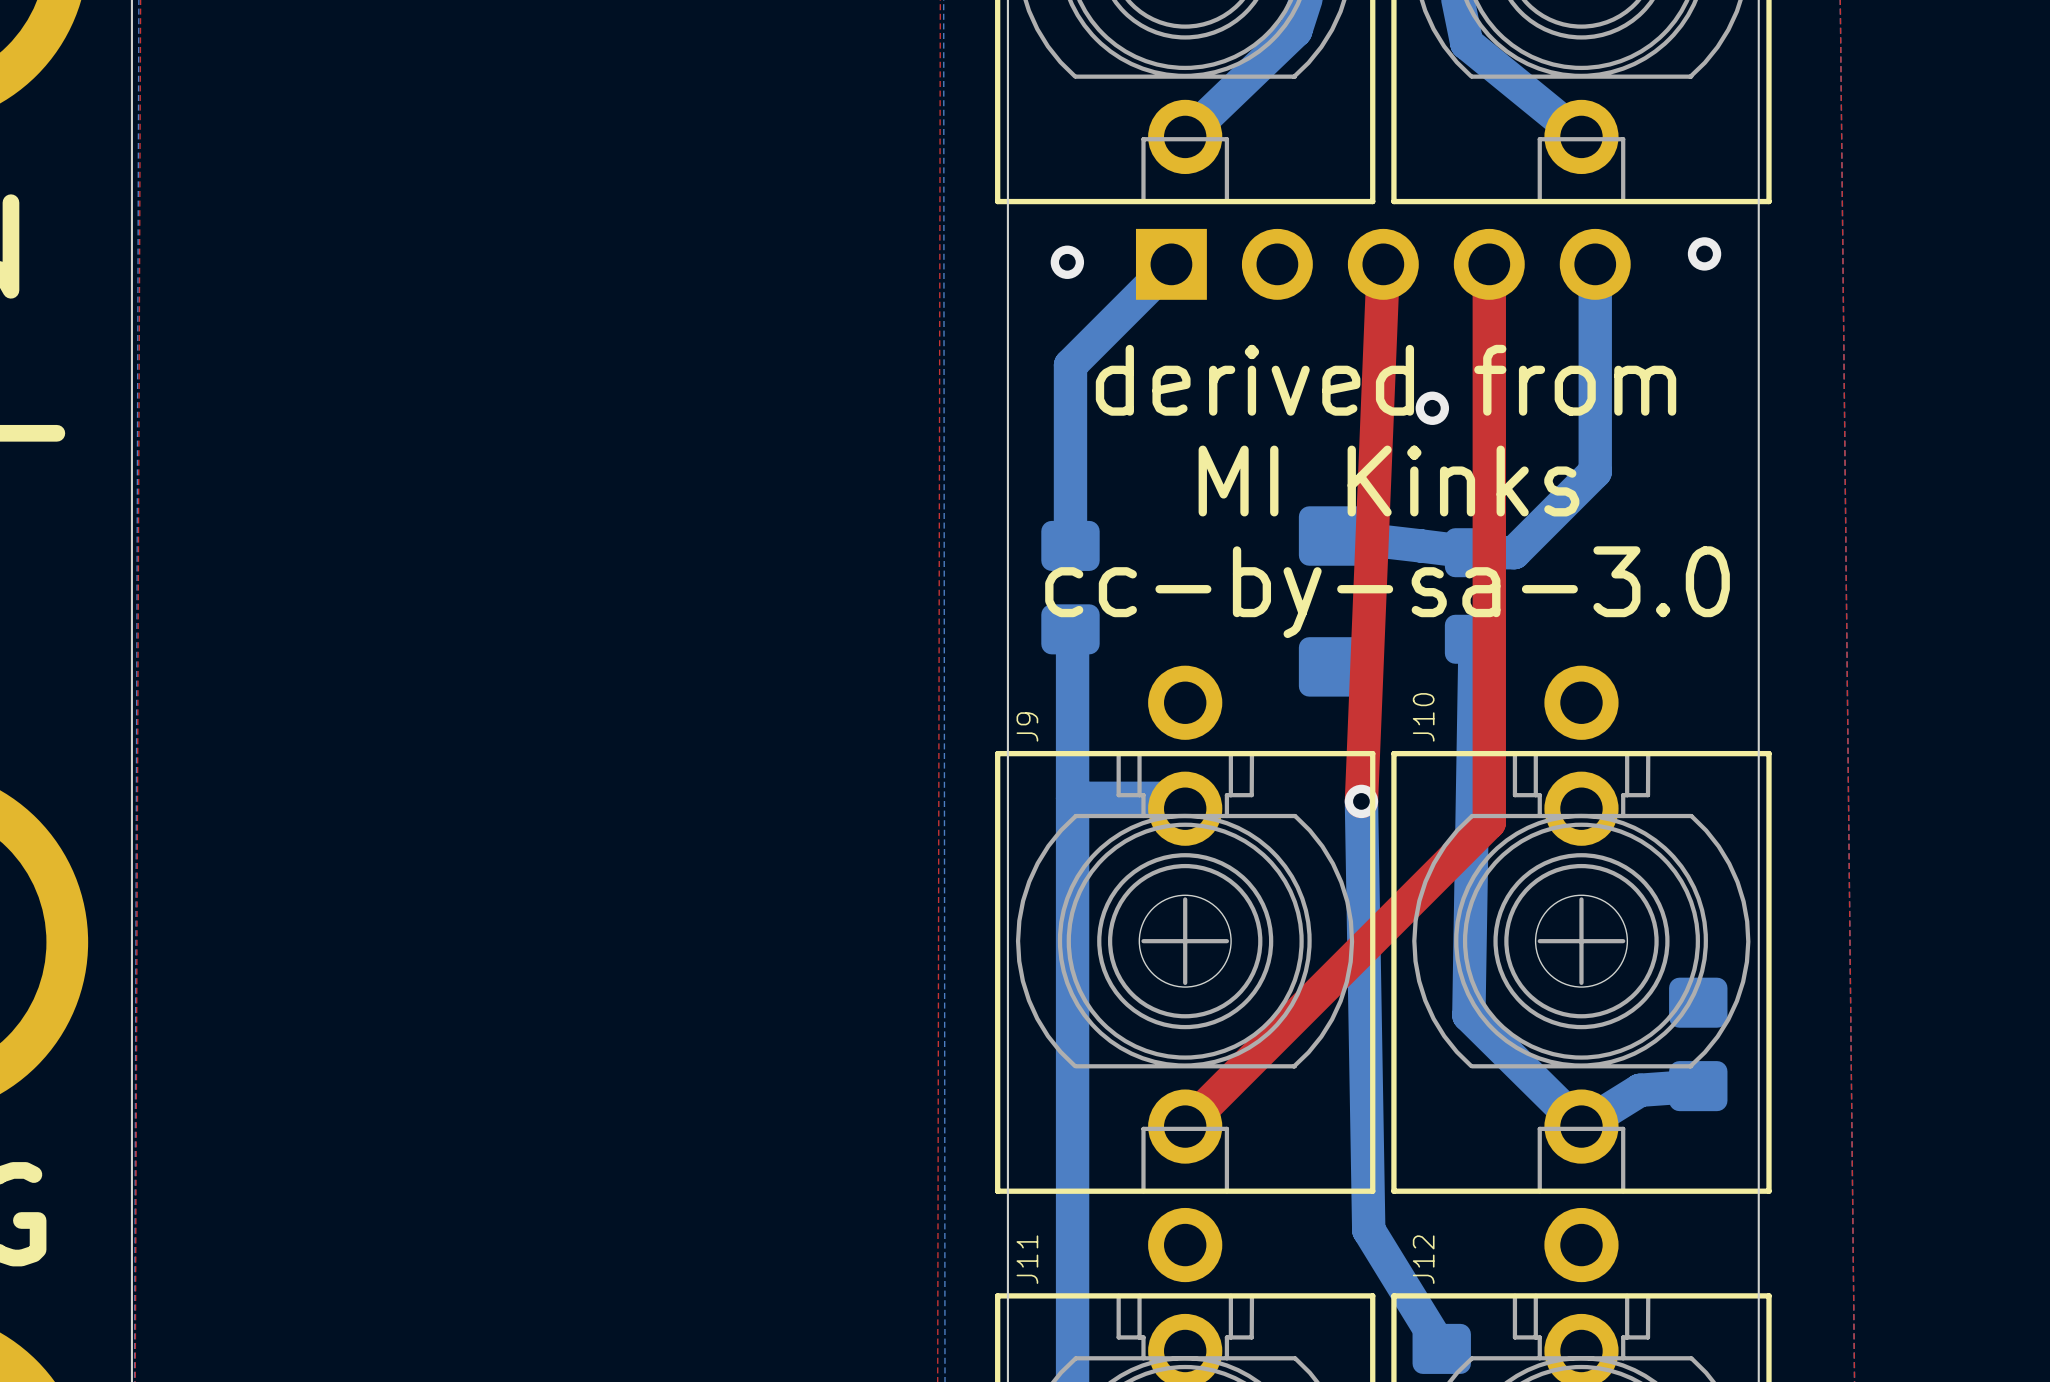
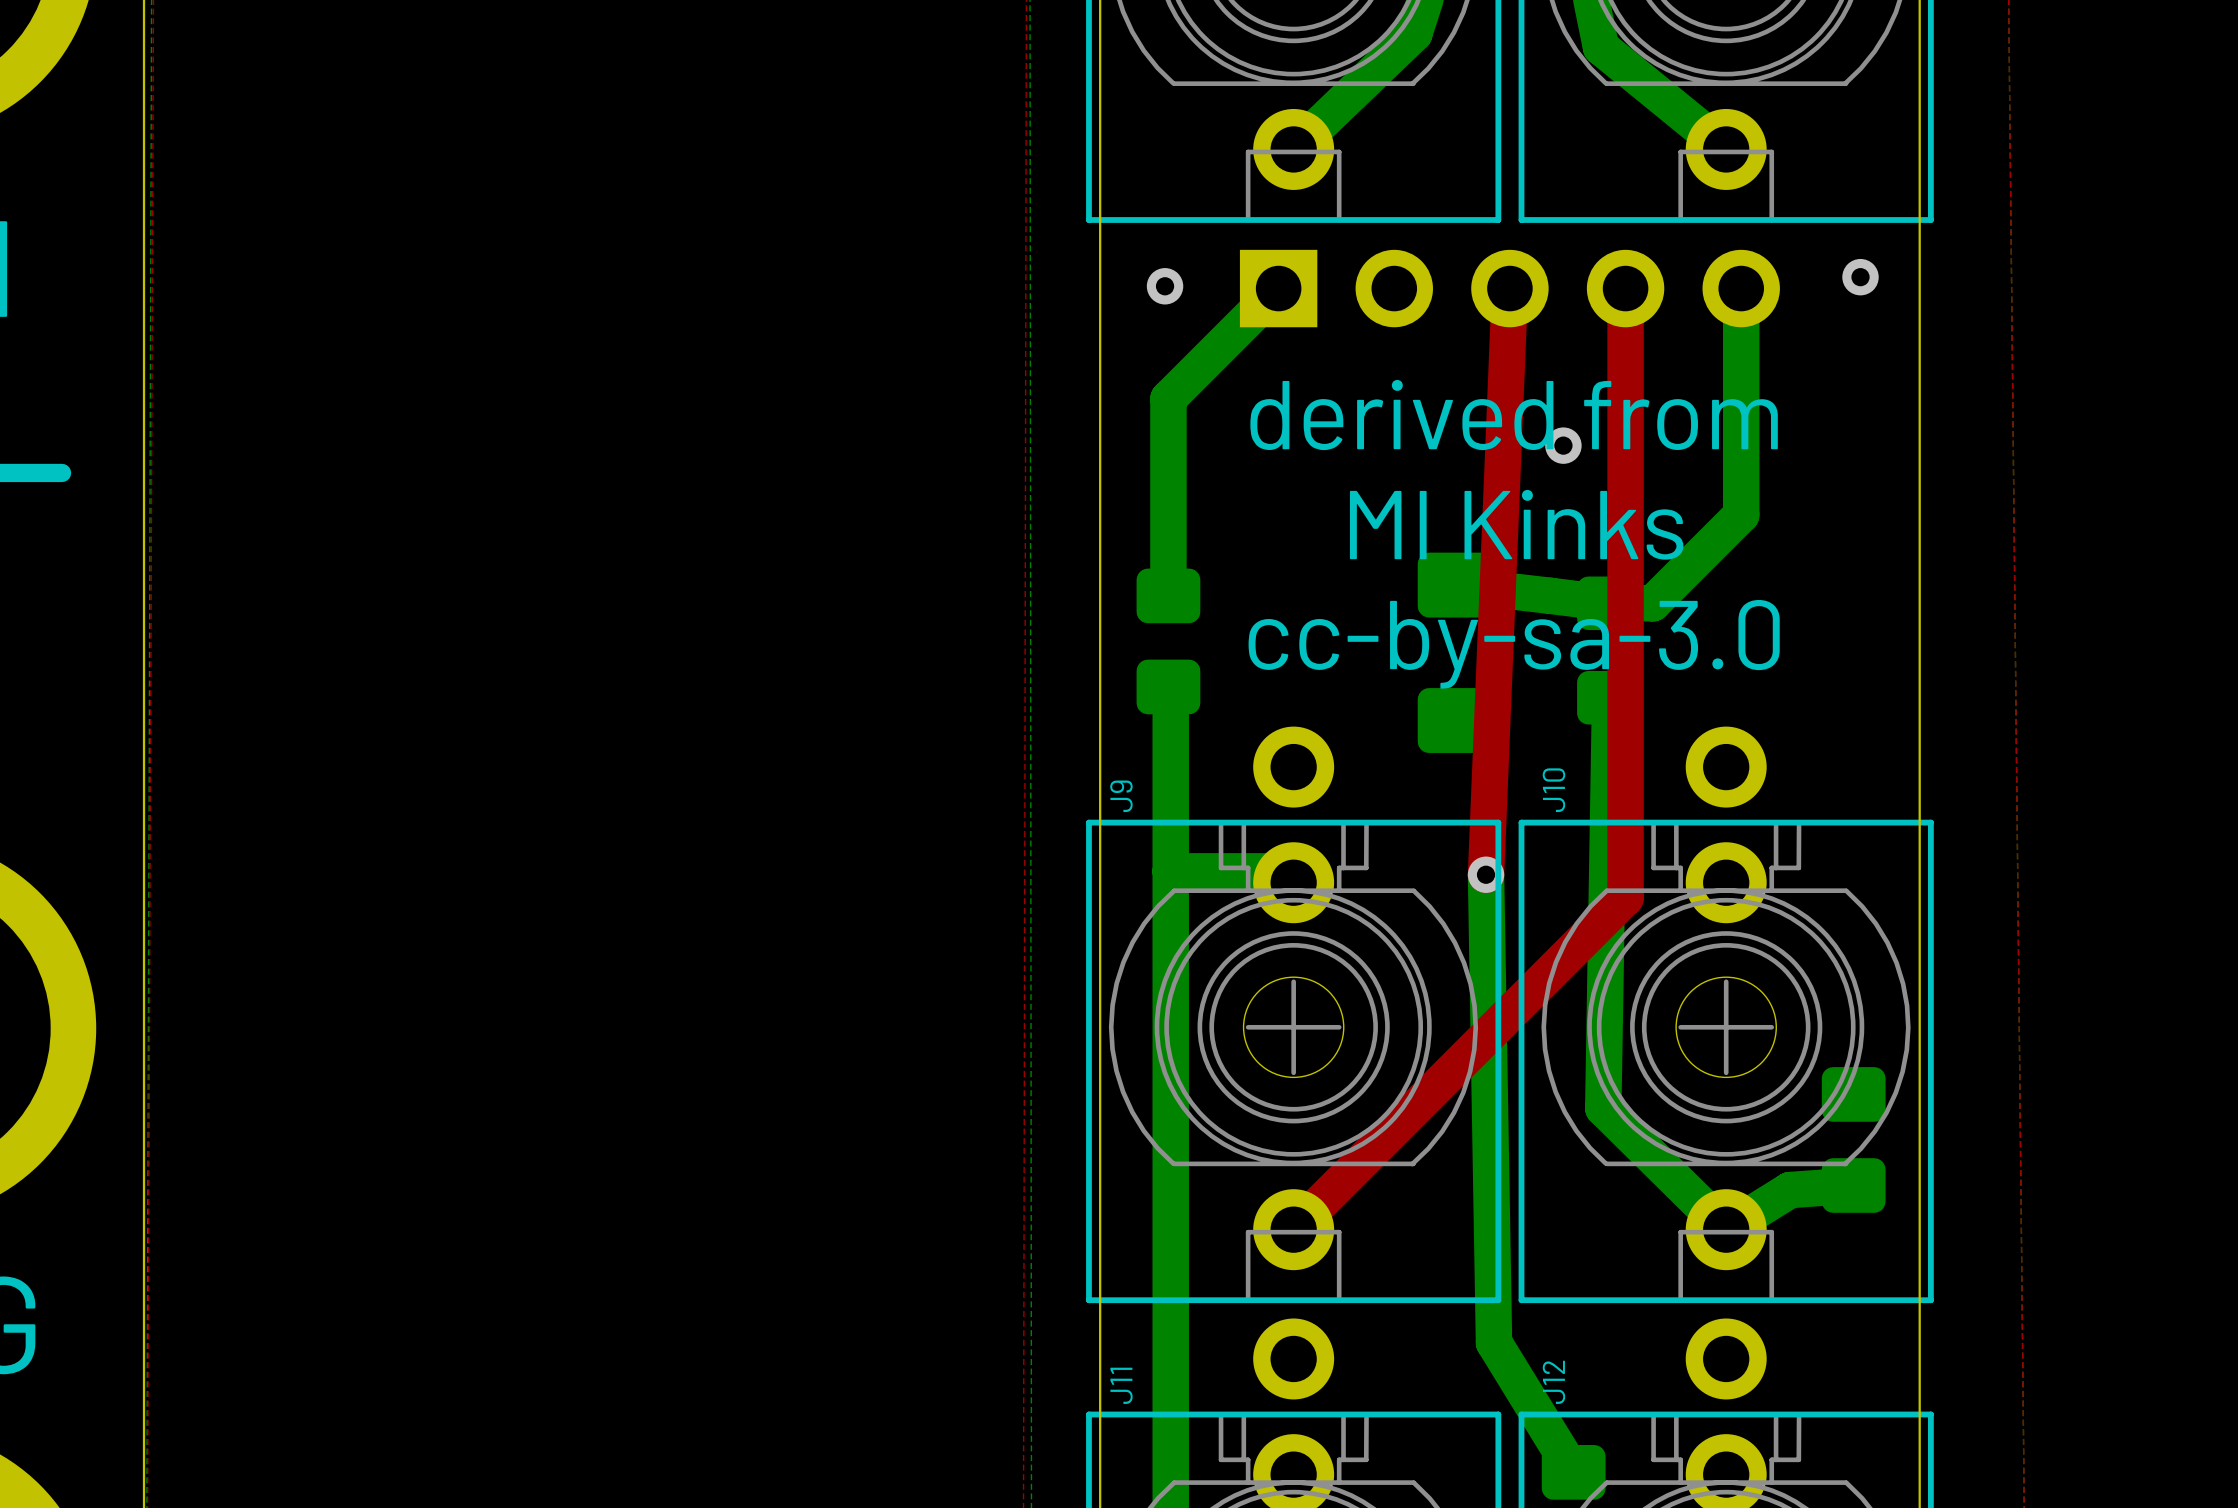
part footprint: [1298, 506, 1372, 697] -> [1417, 552, 1498, 753]

